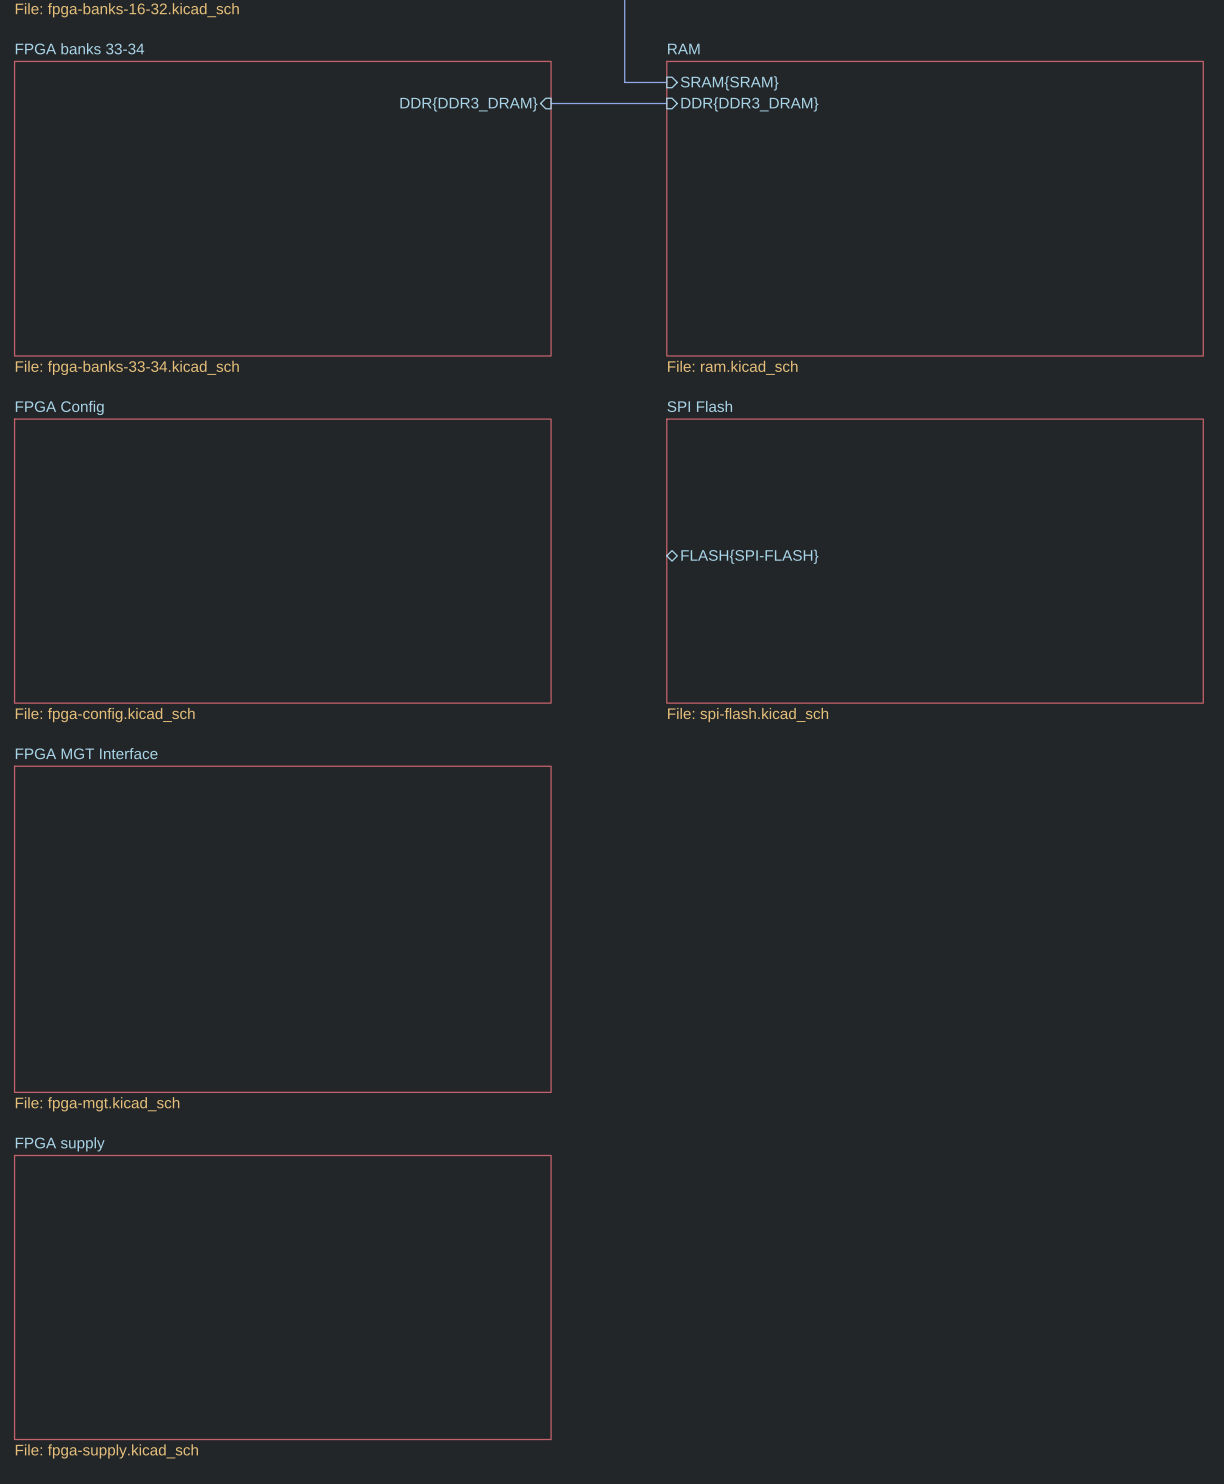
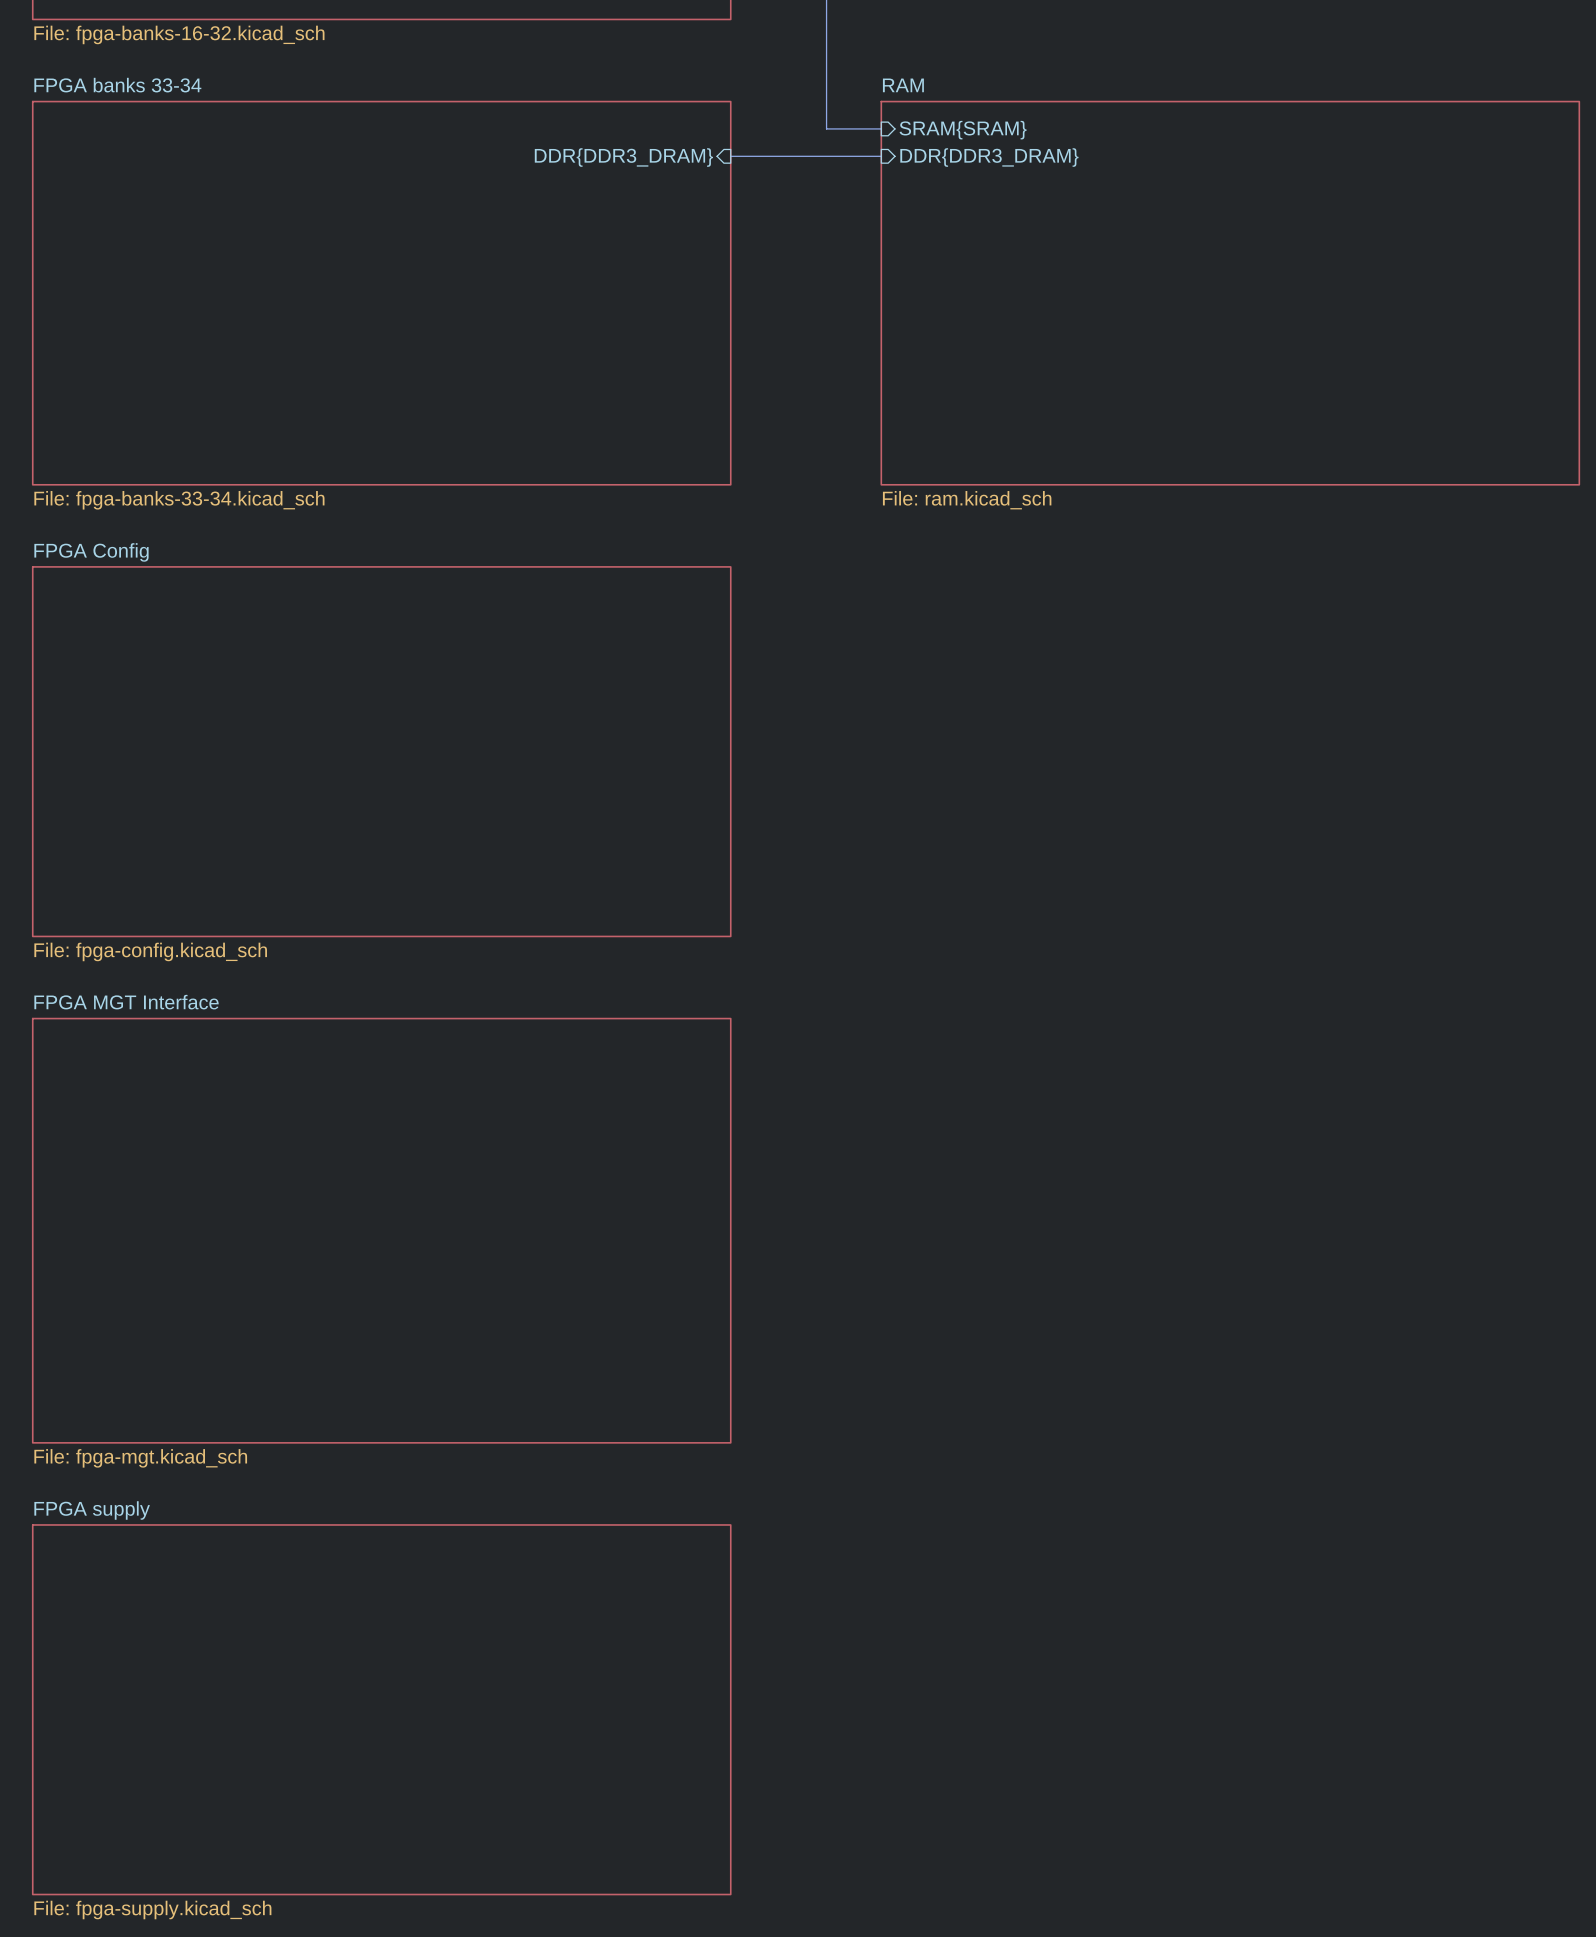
sheet pin: FLASH{SPI-FLASH} (749, 556) -> none
sheet SPI Flash: File: spi-flash.kicad_sch (935, 561) -> none

